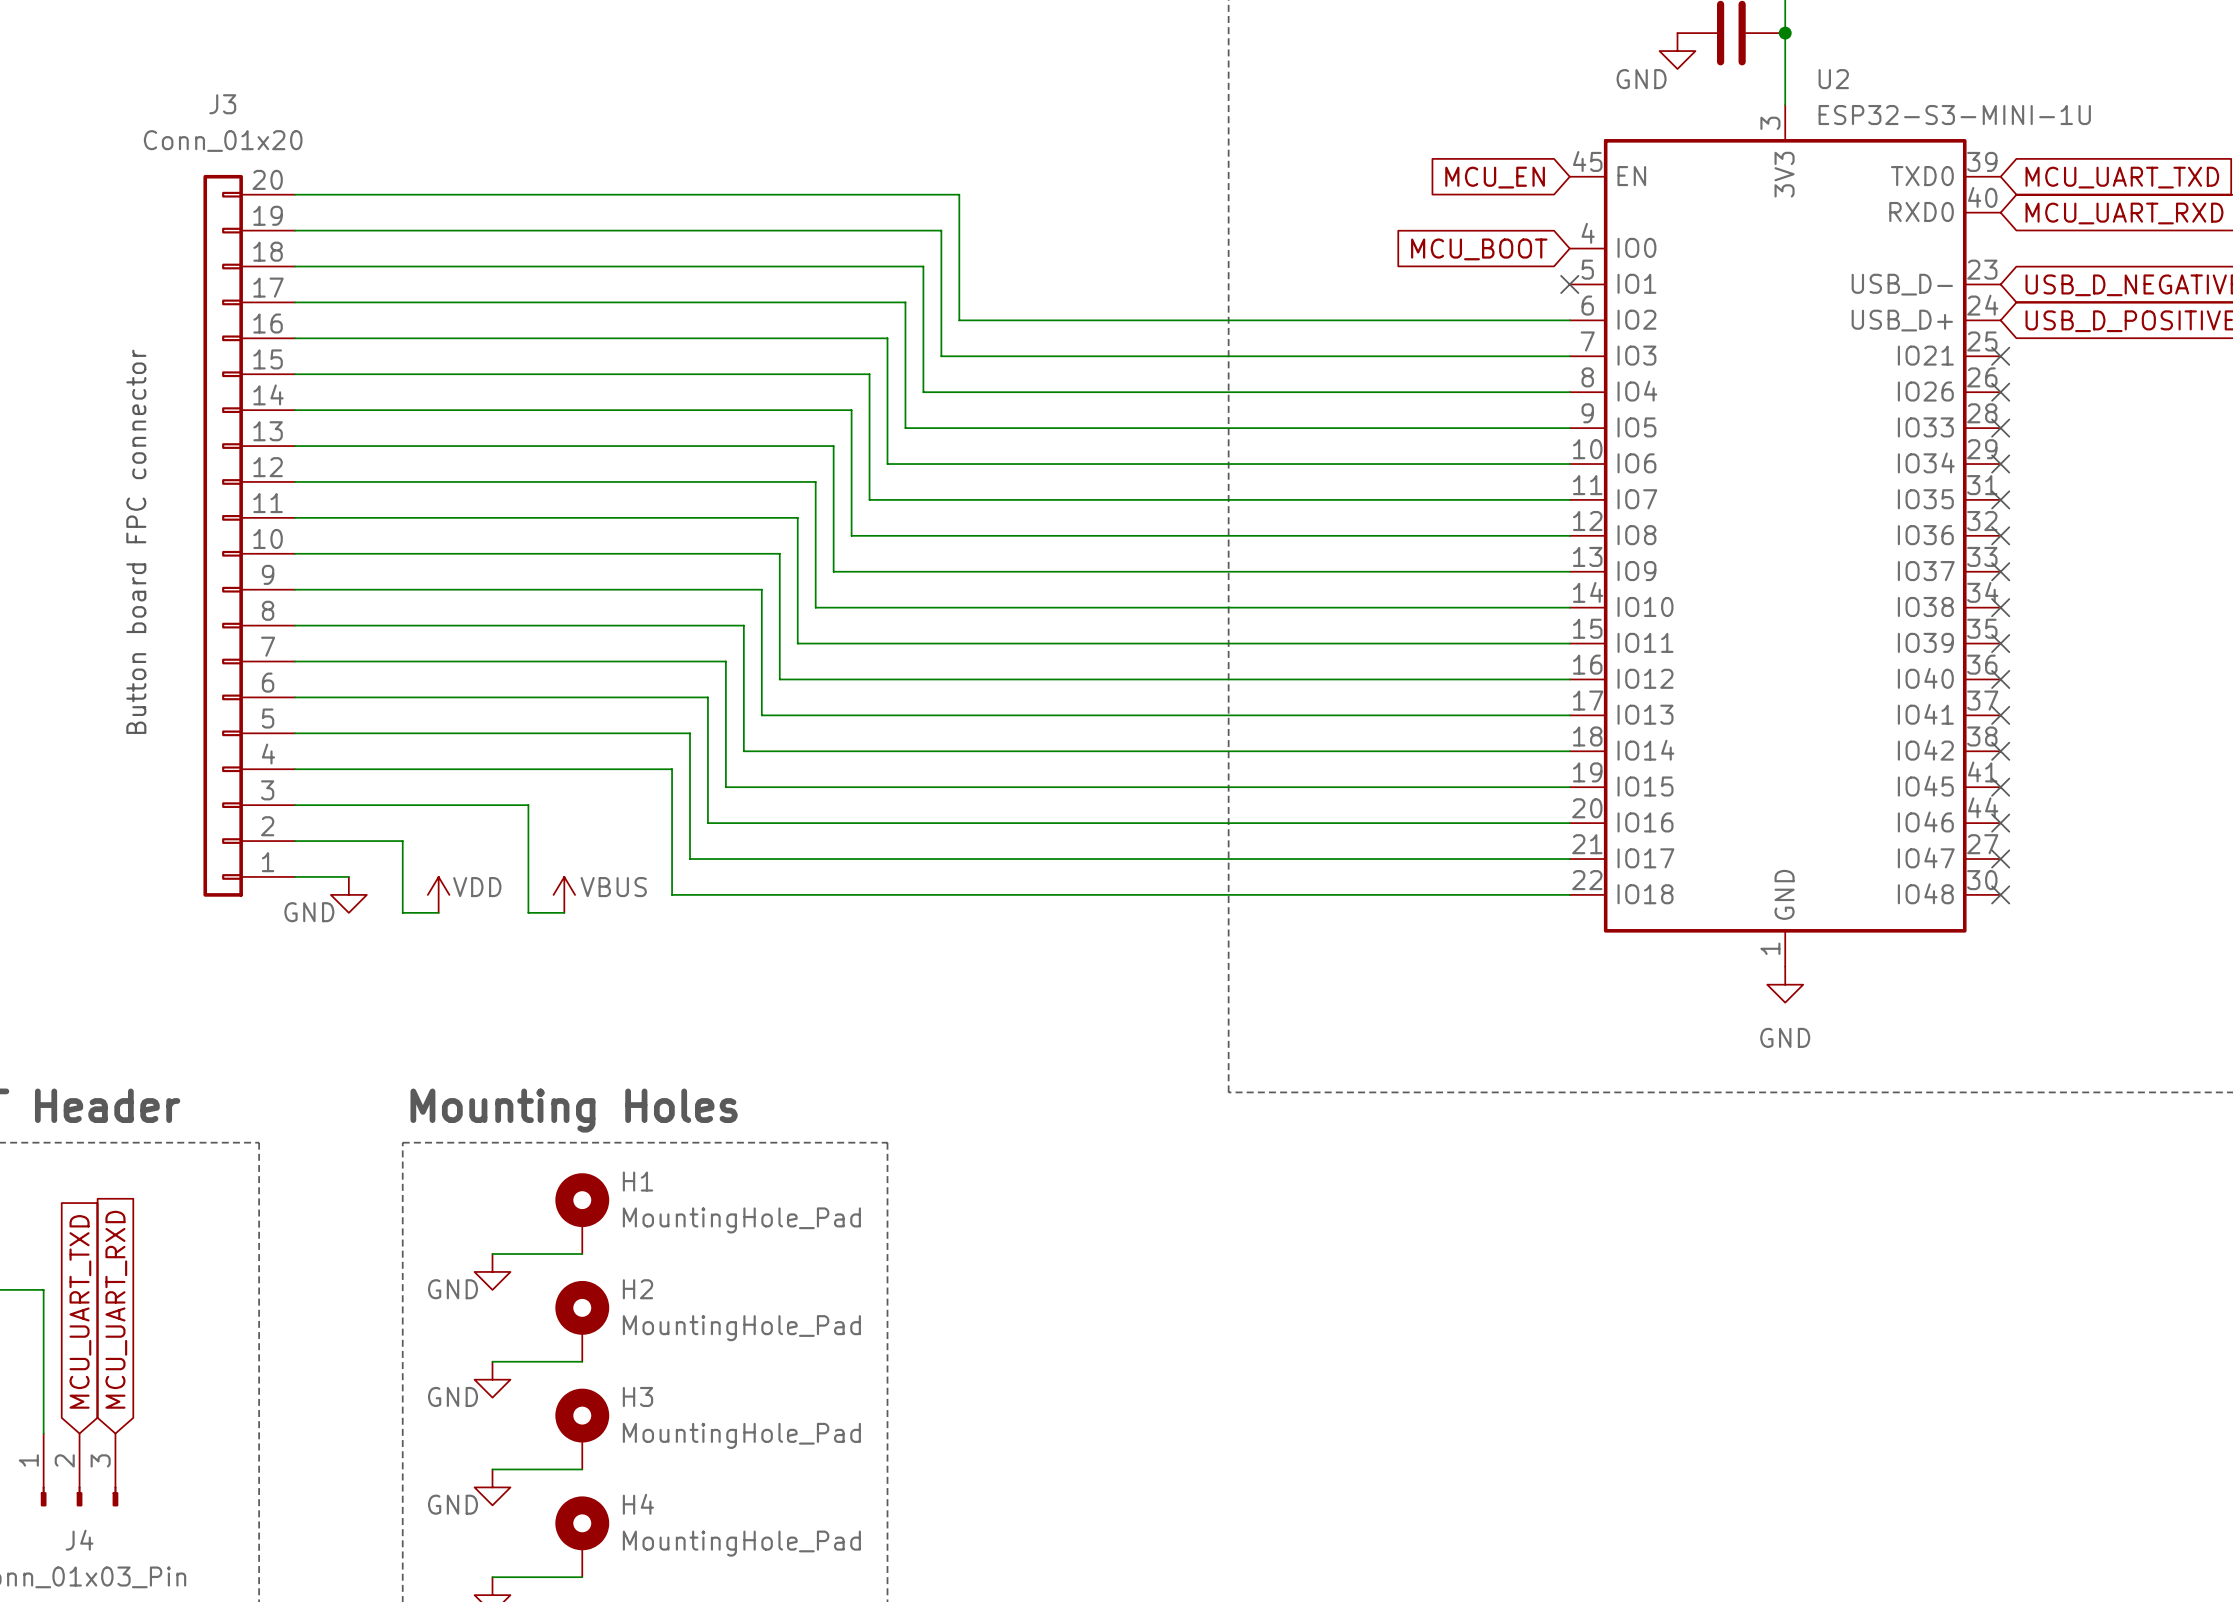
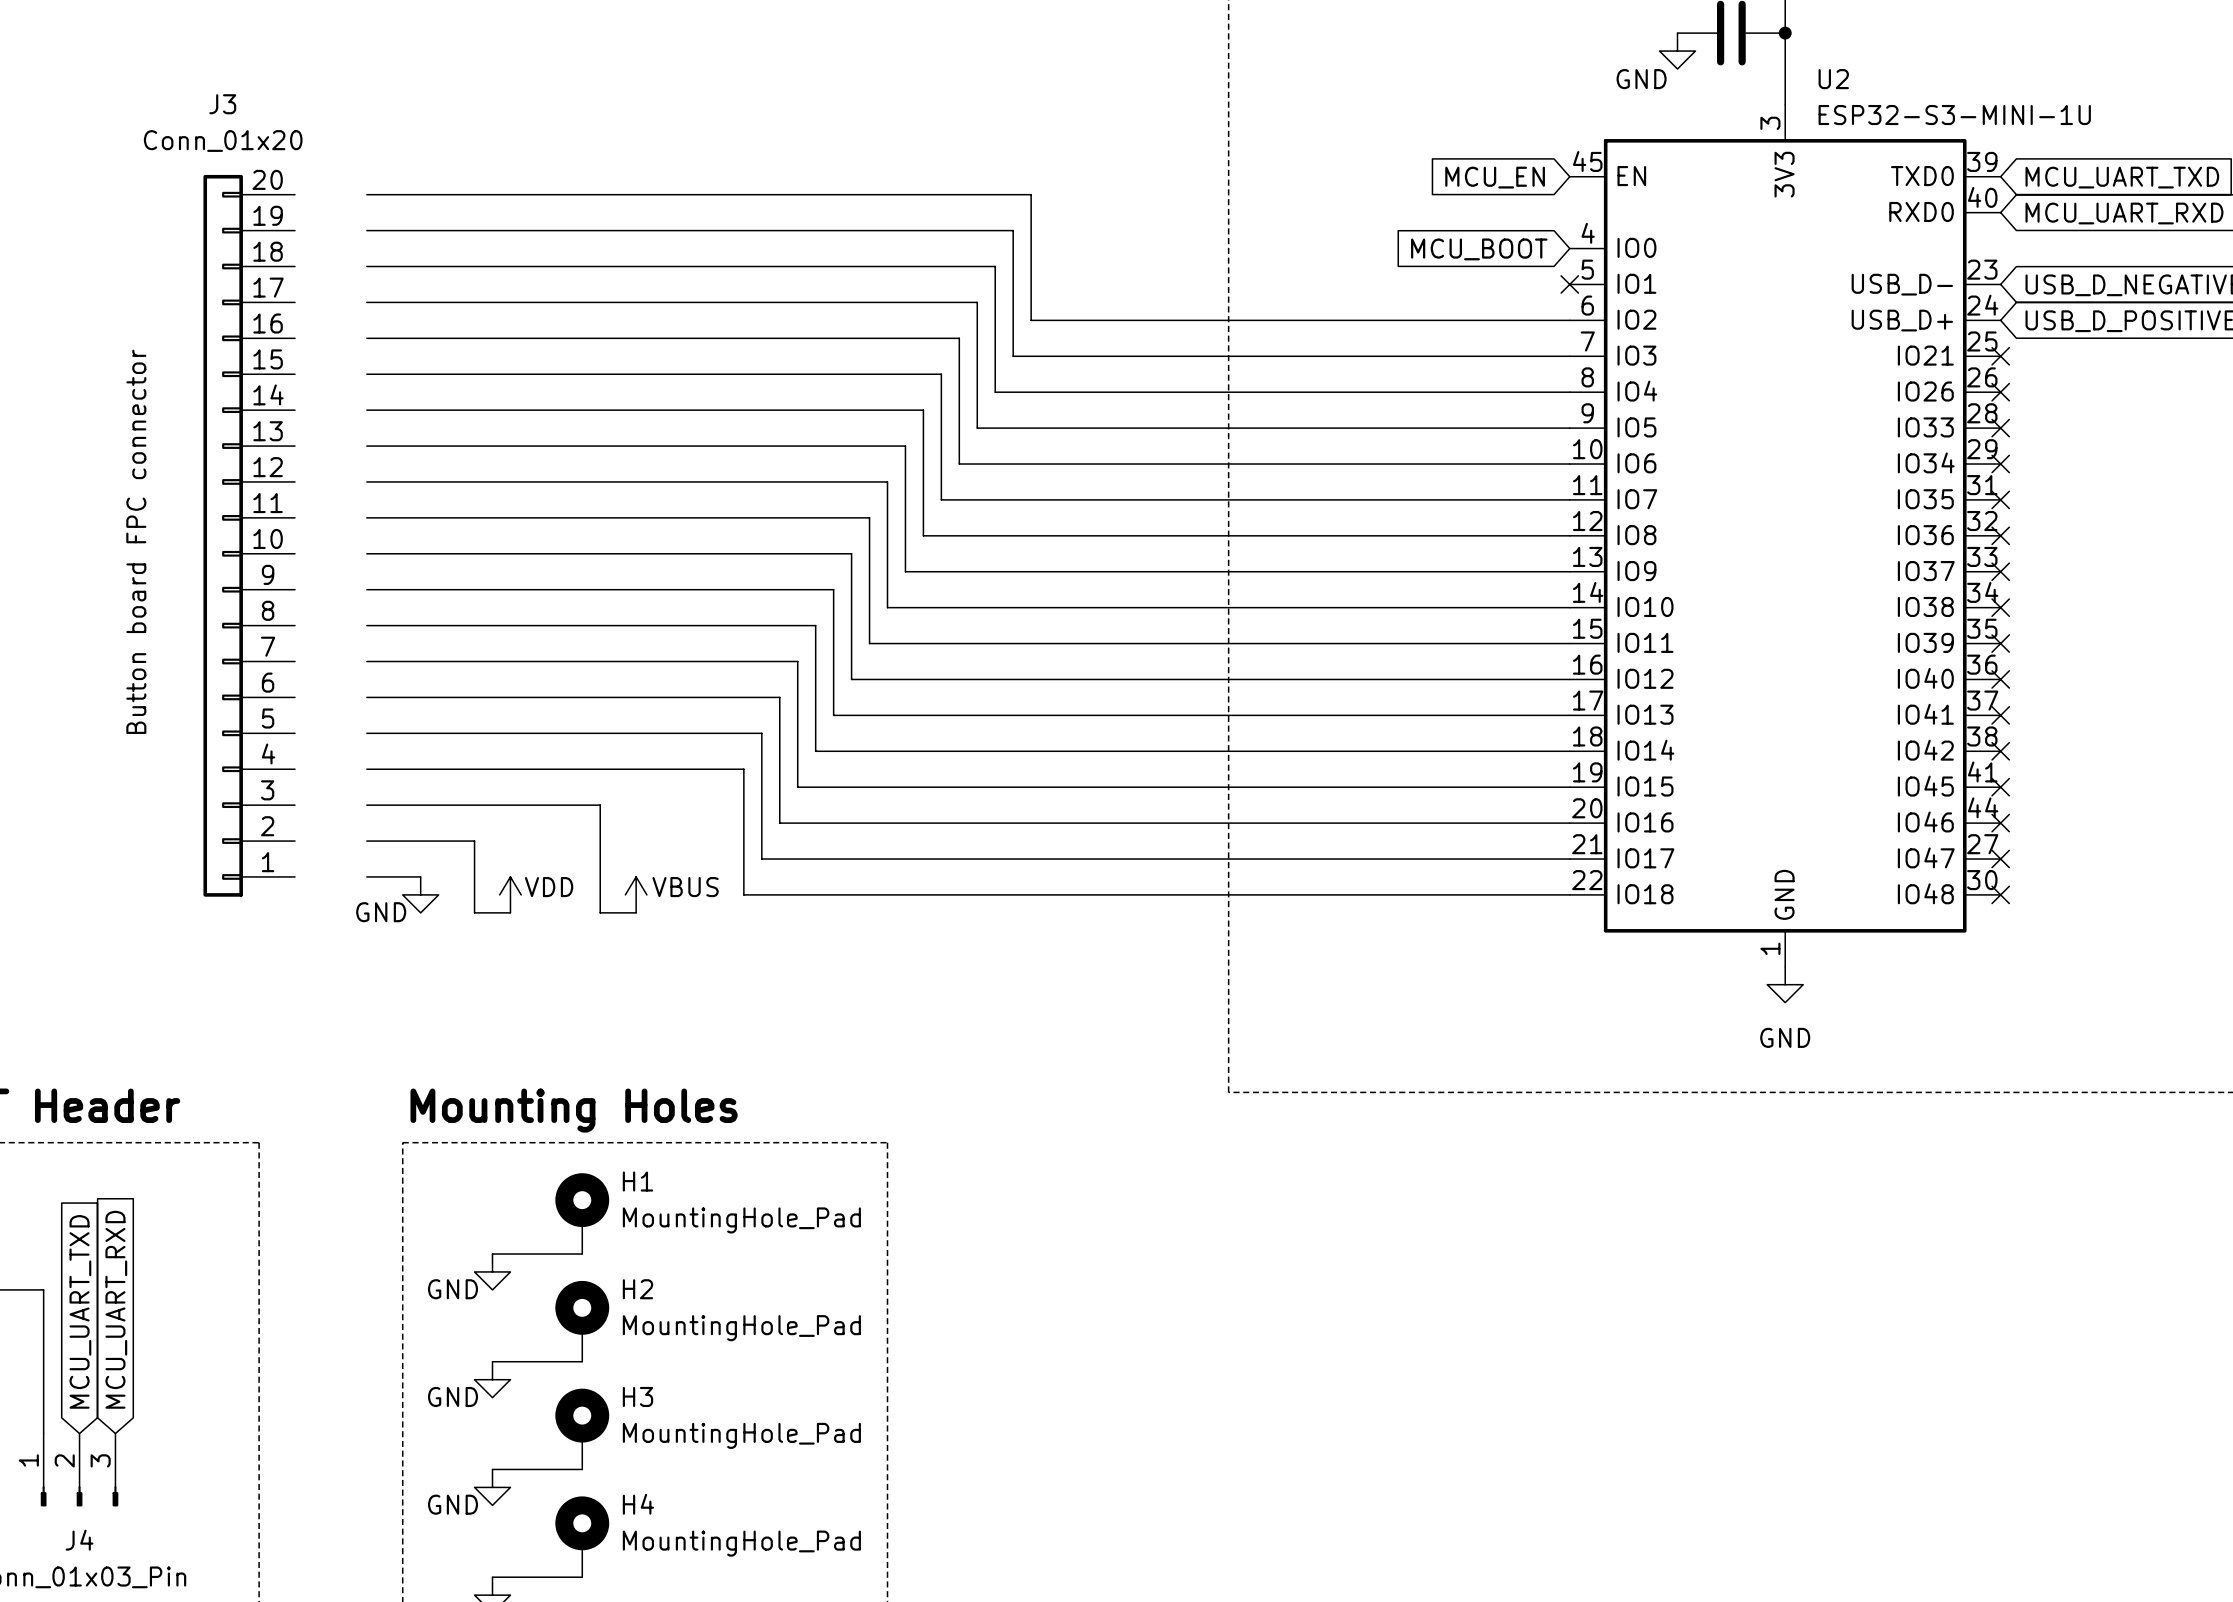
wire: (295, 194) (366, 194) -> none
wire: (959, 194) (959, 320) (1031, 320) -> (959, 194) (1031, 194) (1031, 320)
wire: (295, 230) (366, 230) -> none
wire: (941, 230) (941, 356) (1013, 356) -> (941, 230) (1013, 230) (1013, 356)
wire: (295, 266) (366, 266) -> none
wire: (923, 266) (923, 392) (995, 392) -> (923, 266) (995, 266) (995, 392)
wire: (295, 302) (366, 302) -> none
wire: (905, 302) (905, 428) (977, 428) -> (905, 302) (977, 302) (977, 428)
wire: (295, 338) (366, 338) -> none
wire: (887, 338) (887, 464) (959, 464) -> (887, 338) (959, 338) (959, 464)
wire: (295, 374) (366, 374) -> none
wire: (869, 374) (869, 499) (941, 499) -> (869, 374) (941, 374) (941, 499)
wire: (295, 410) (366, 410) -> none
wire: (851, 410) (851, 535) (923, 535) -> (851, 410) (923, 410) (923, 535)
wire: (295, 446) (366, 446) -> none
wire: (833, 446) (833, 571) (905, 571) -> (833, 446) (905, 446) (905, 571)
wire: (295, 481) (366, 481) -> none
wire: (815, 481) (815, 607) (887, 607) -> (815, 481) (887, 481) (887, 607)
wire: (295, 517) (366, 517) -> none
wire: (797, 517) (797, 643) (869, 643) -> (797, 517) (869, 517) (869, 643)
wire: (295, 553) (366, 553) -> none
wire: (779, 553) (779, 679) (851, 679) -> (779, 553) (851, 553) (851, 679)
wire: (295, 589) (366, 589) -> none
wire: (761, 589) (761, 715) (833, 715) -> (761, 589) (833, 589) (833, 715)
wire: (295, 625) (366, 625) -> none
wire: (743, 625) (743, 751) (815, 751) -> (743, 625) (815, 625) (815, 751)
wire: (295, 661) (366, 661) -> none
wire: (725, 661) (725, 787) (797, 787) -> (725, 661) (797, 661) (797, 787)
wire: (295, 697) (366, 697) -> none
wire: (707, 697) (707, 823) (779, 823) -> (707, 697) (779, 697) (779, 823)
wire: (295, 733) (366, 733) -> none
wire: (690, 733) (690, 859) (761, 859) -> (690, 733) (761, 733) (761, 859)
wire: (295, 769) (366, 769) -> none
wire: (672, 769) (672, 894) (743, 894) -> (672, 769) (743, 769) (743, 894)
wire: (295, 805) (366, 805) -> none
wire: (528, 805) (528, 912) (564, 912) -> (528, 805) (600, 805) (600, 912) (636, 912)
wire: (295, 841) (366, 841) -> none
wire: (402, 841) (402, 912) (438, 912) -> (402, 841) (474, 841) (474, 912) (510, 912)
wire: (295, 876) (348, 876) -> (366, 876) (420, 876)
power symbol position: GND (348, 894) -> GND (420, 894)
power symbol position: VDD (438, 894) -> VDD (510, 894)
power symbol position: VBUS (564, 894) -> VBUS (636, 894)

